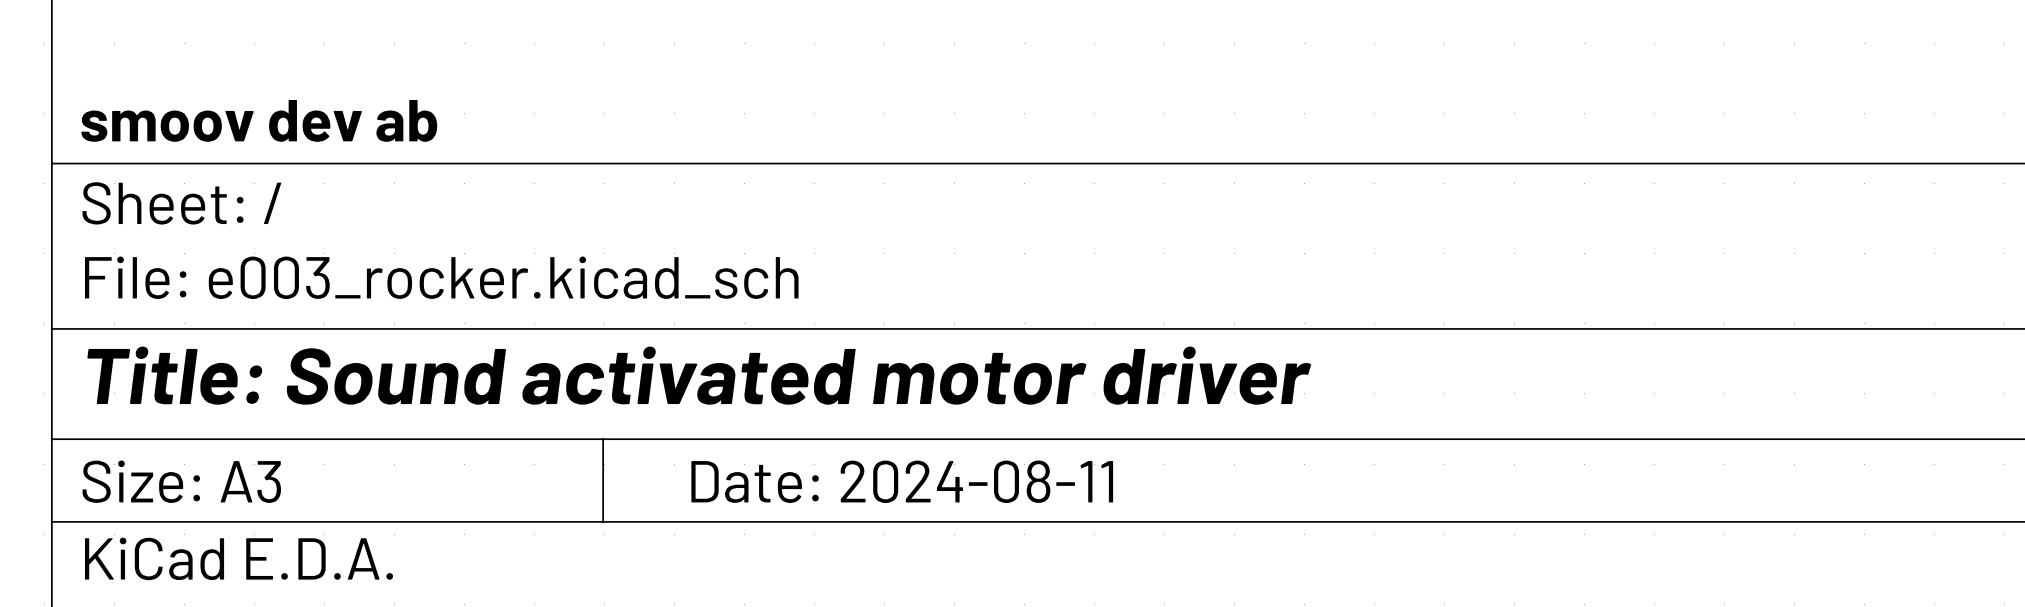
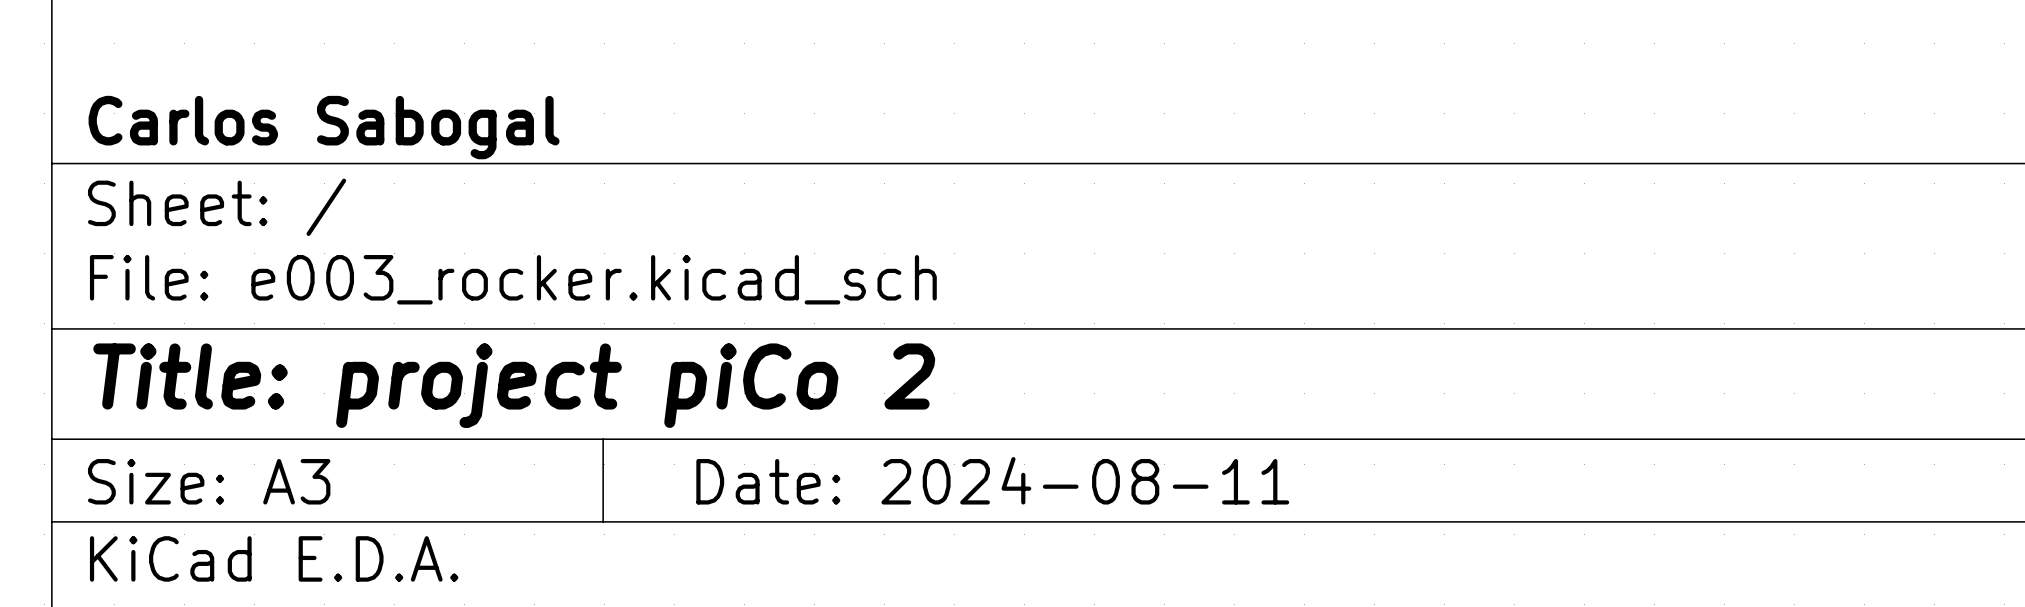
title block: smoov dev ab (259, 120) -> Carlos Sabogal (324, 127)
title block: Title: Sound activated motor driver (699, 375) -> Title: project piCo 2 (514, 385)

